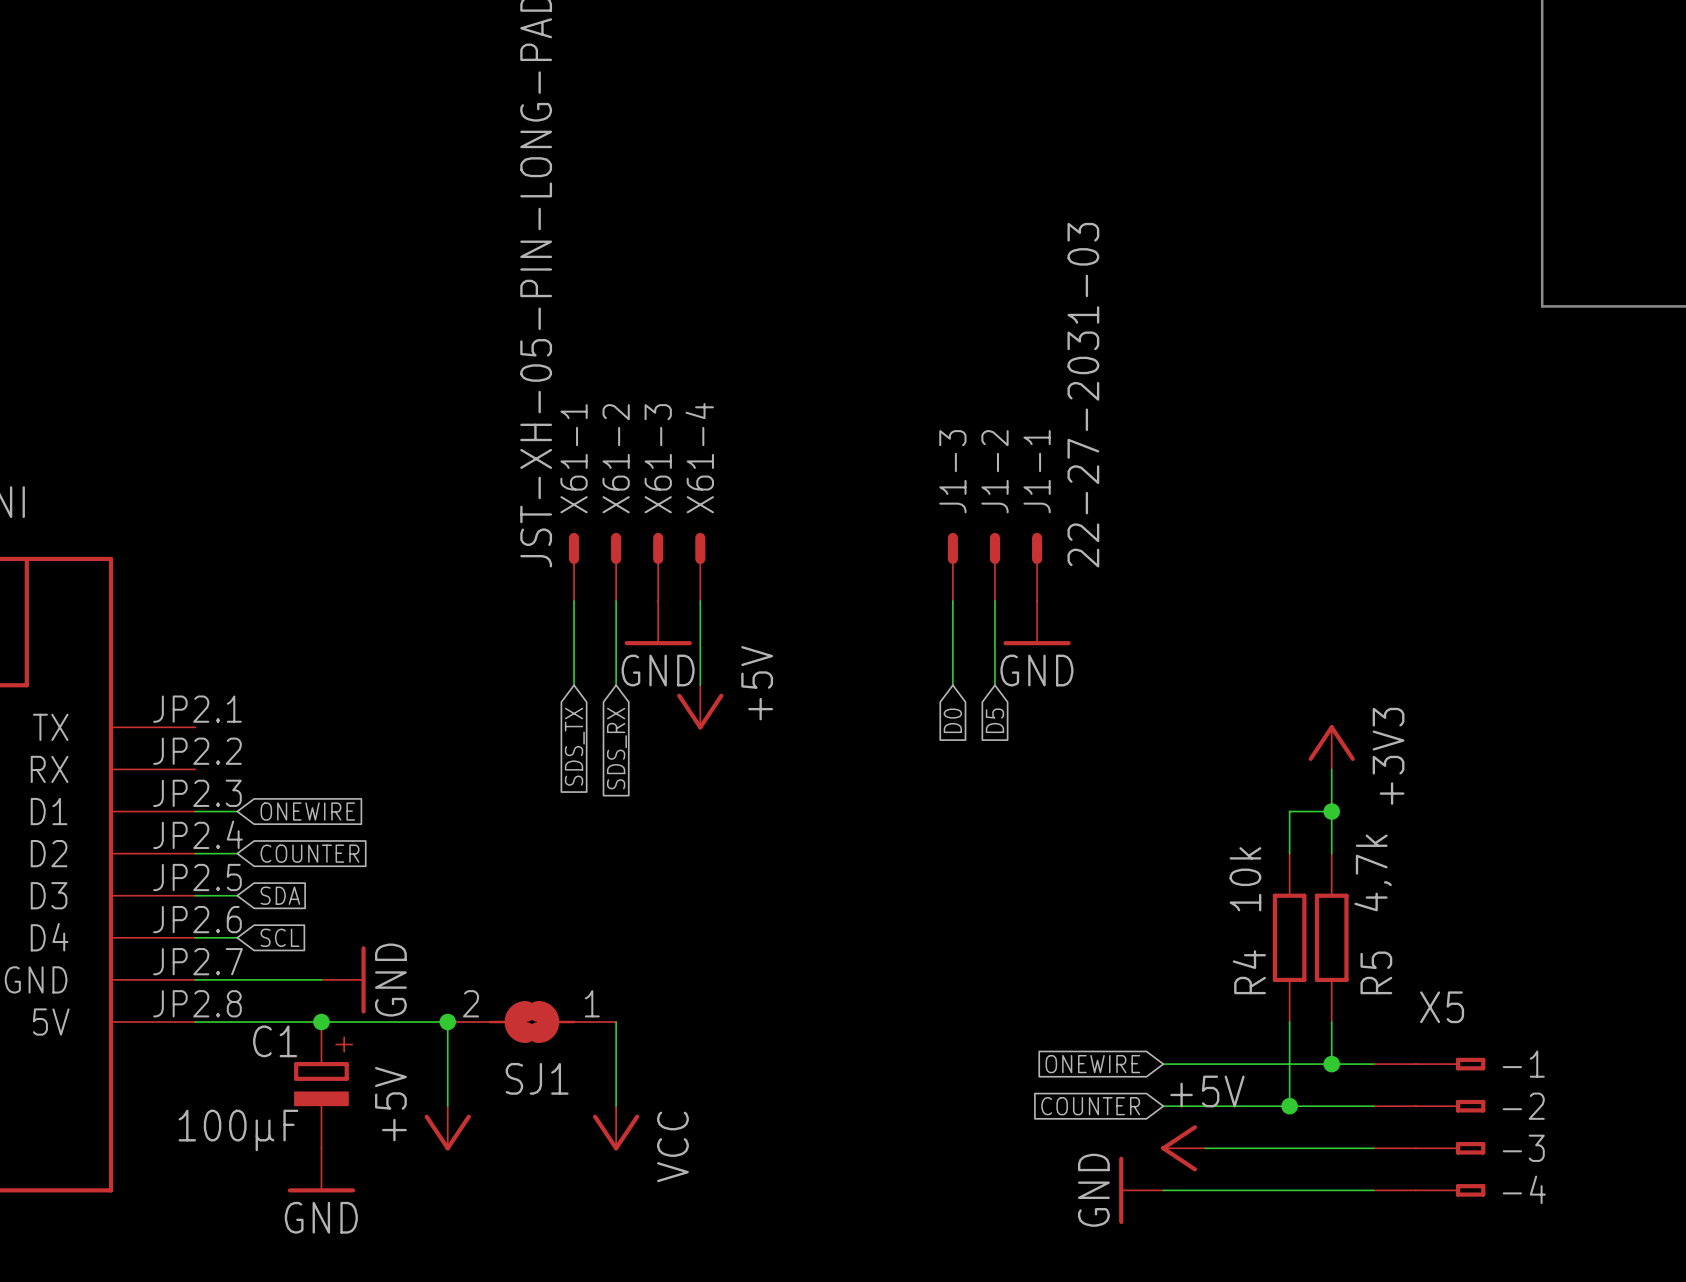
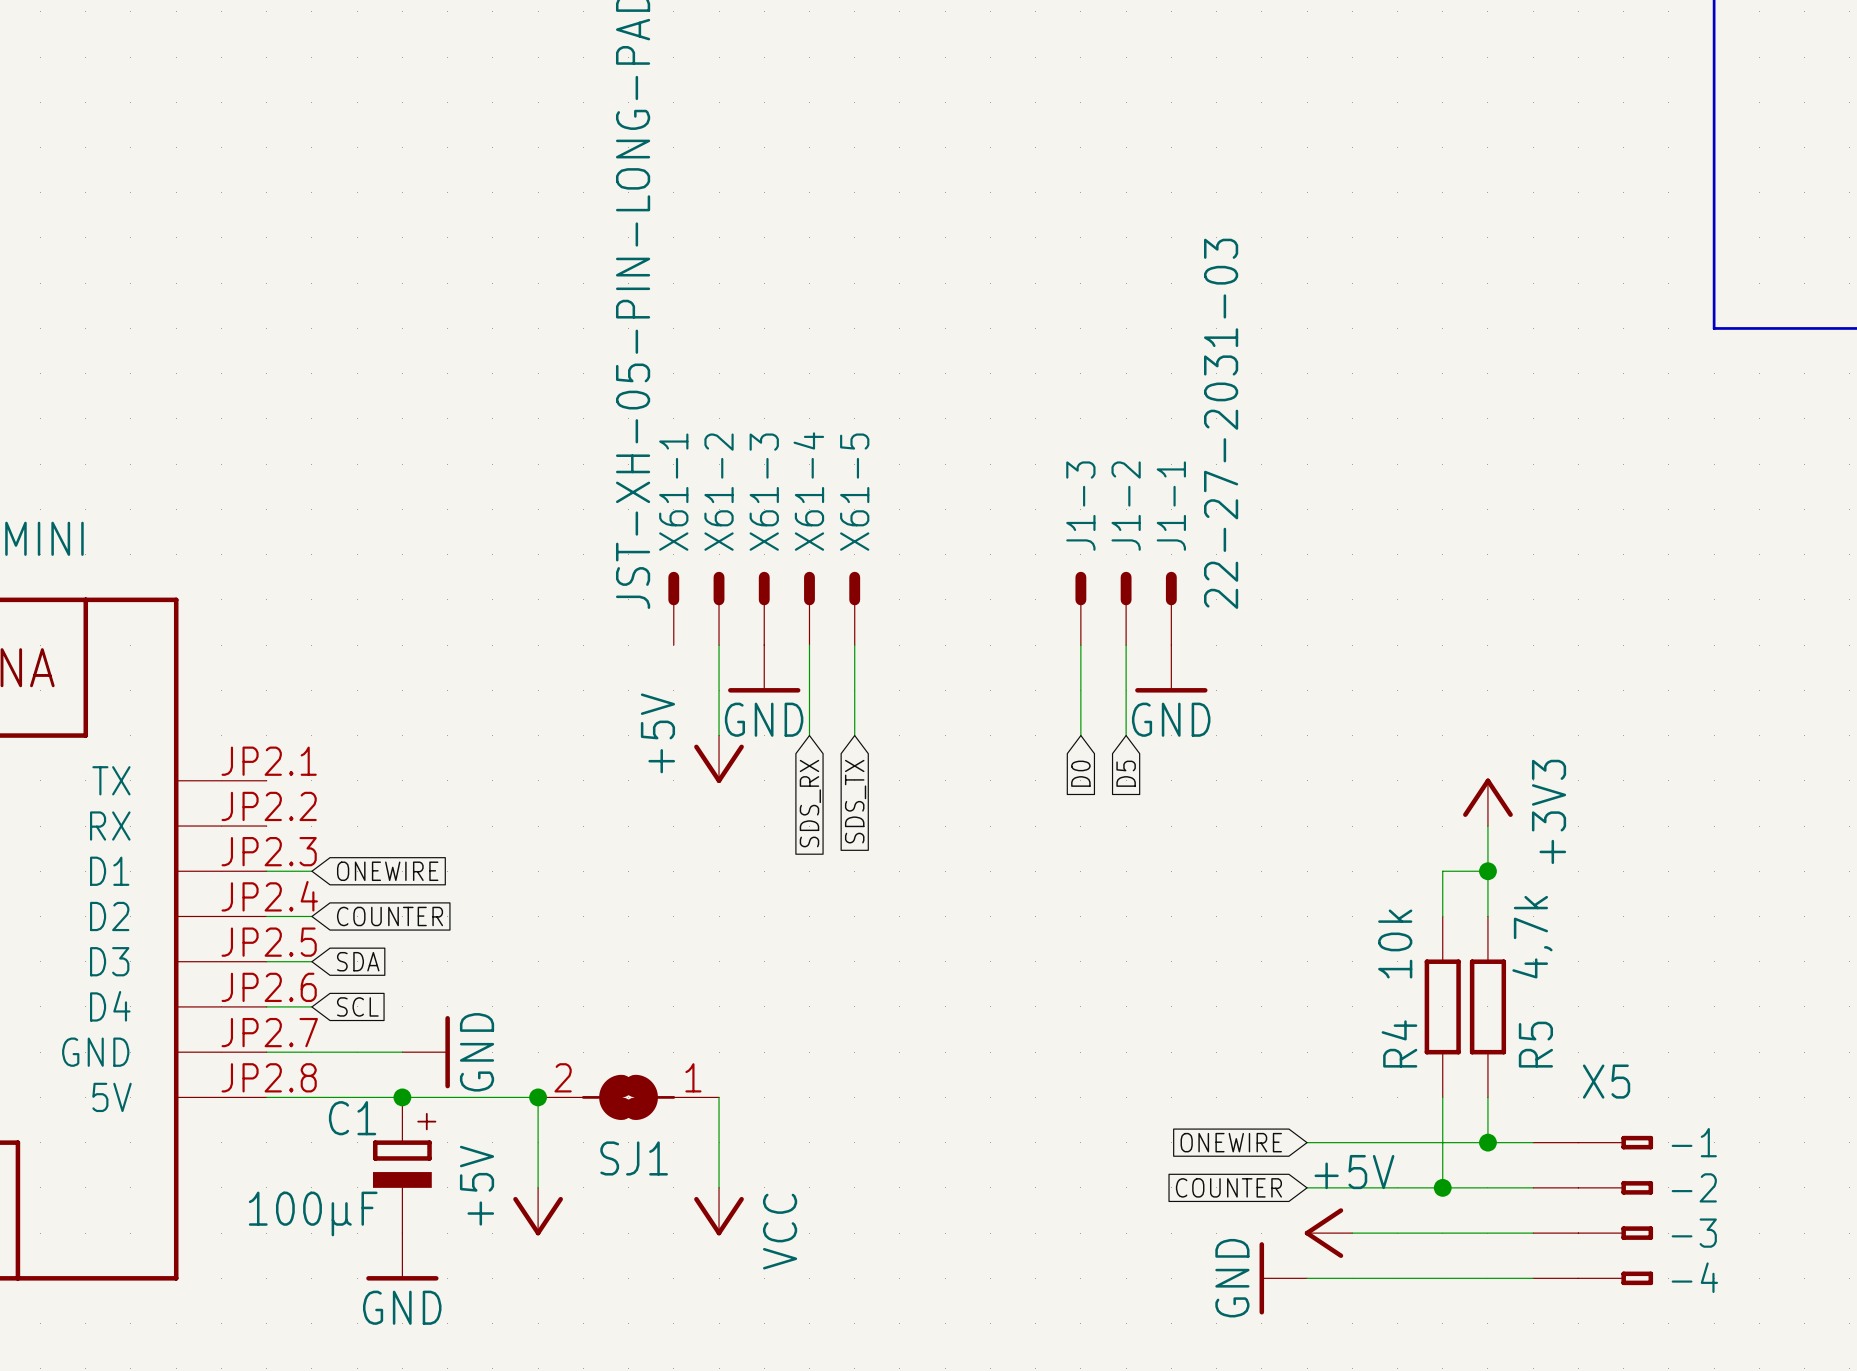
X61-5: none -> (854, 608)
wire: (574, 601) (574, 685) -> (854, 645) (854, 735)
power symbol text position: +5V (757, 683) -> +5V (657, 733)
power symbol position: +5V (700, 707) -> +5V (719, 759)
global label position: SDS_TX (574, 746) -> SDS_TX (855, 801)
global label position: SDS_RX (616, 748) -> SDS_RX (810, 803)

